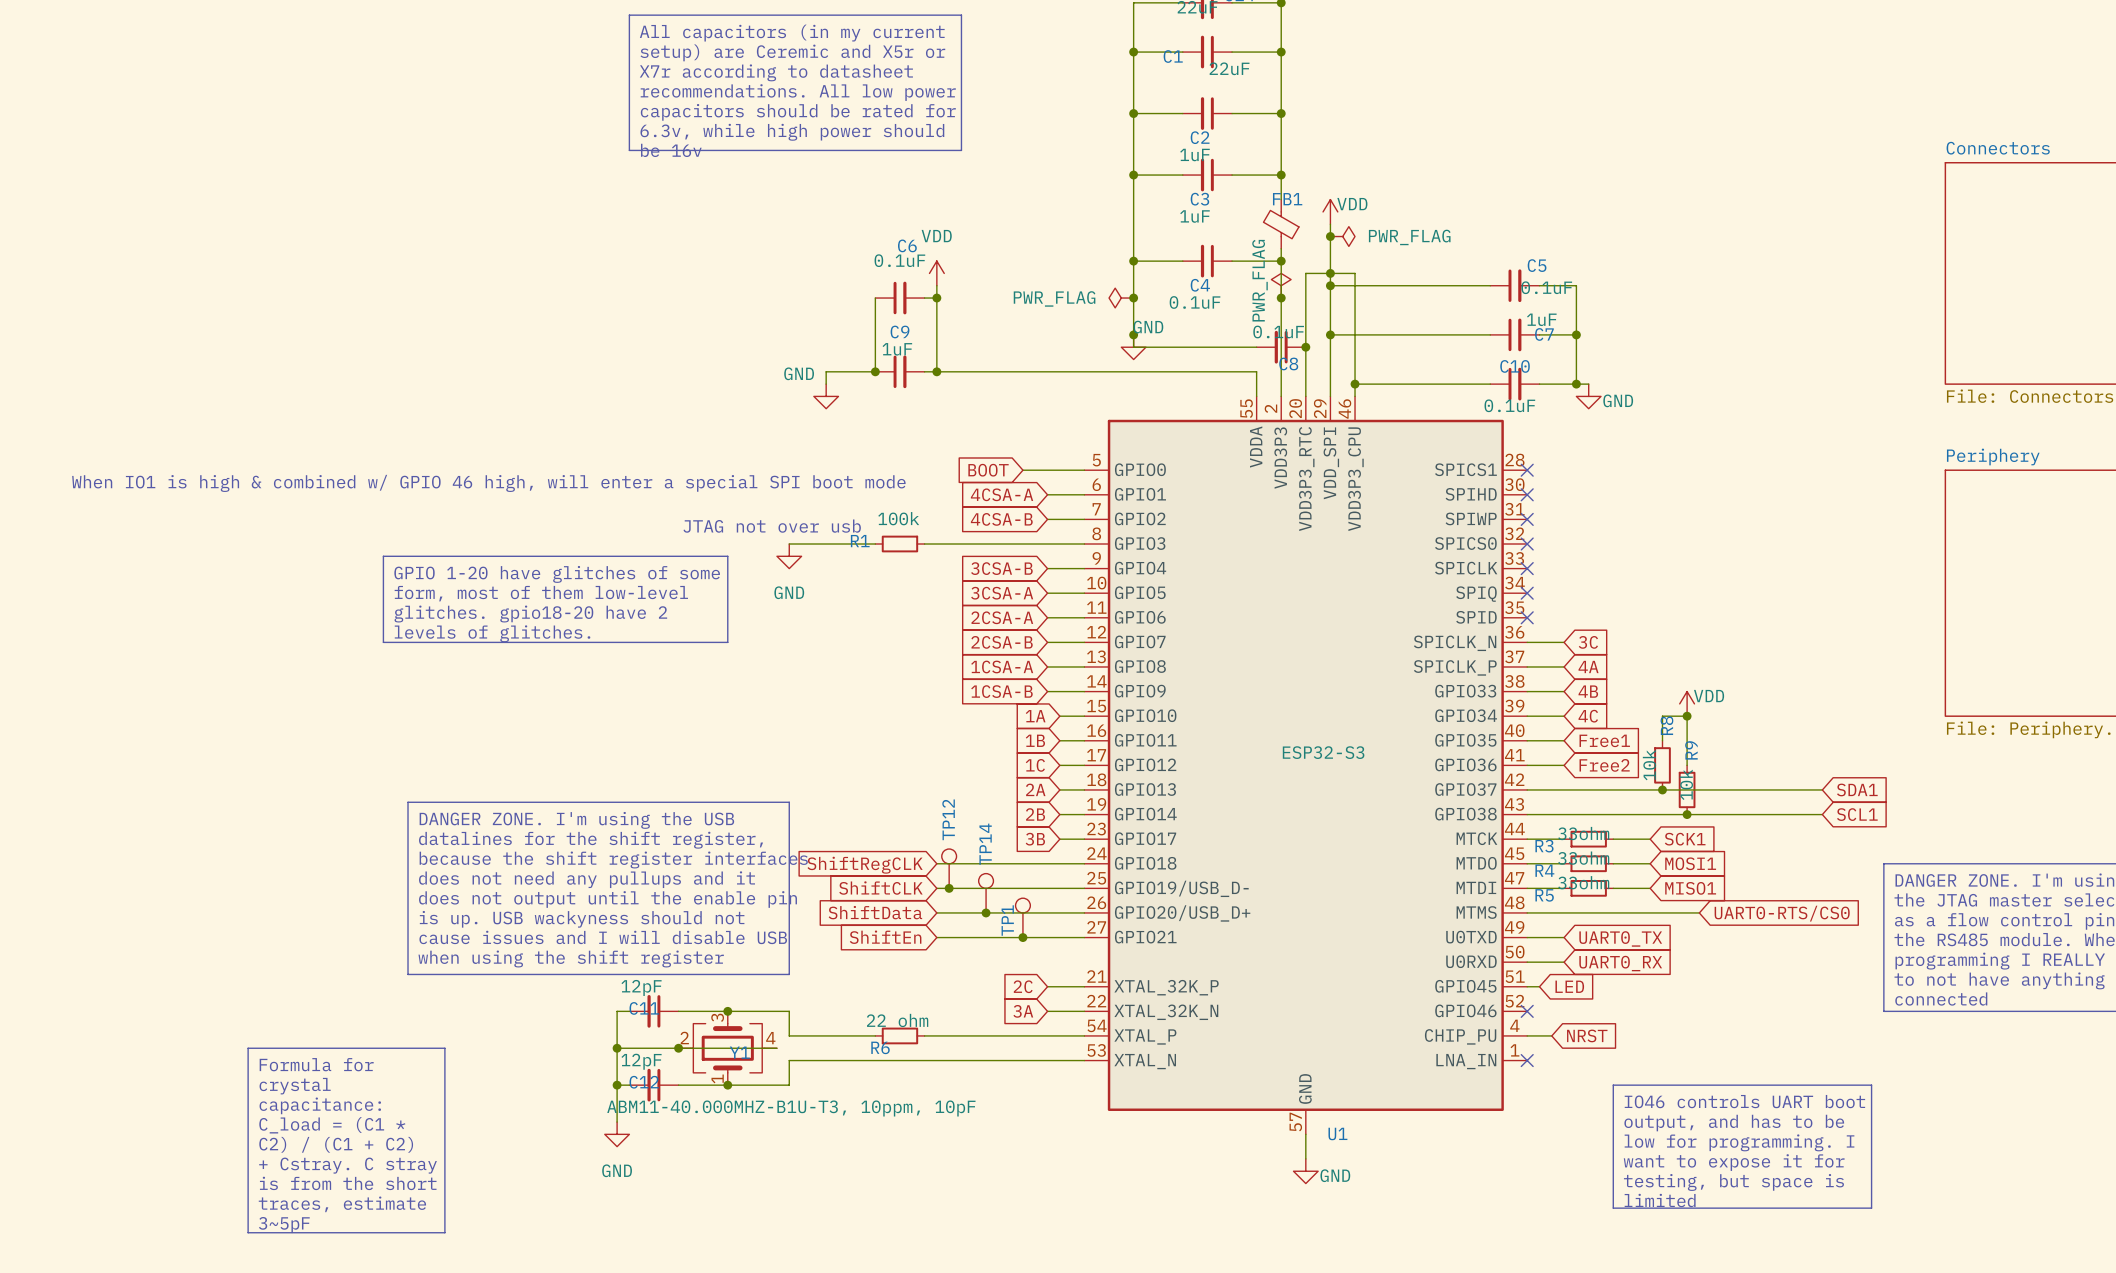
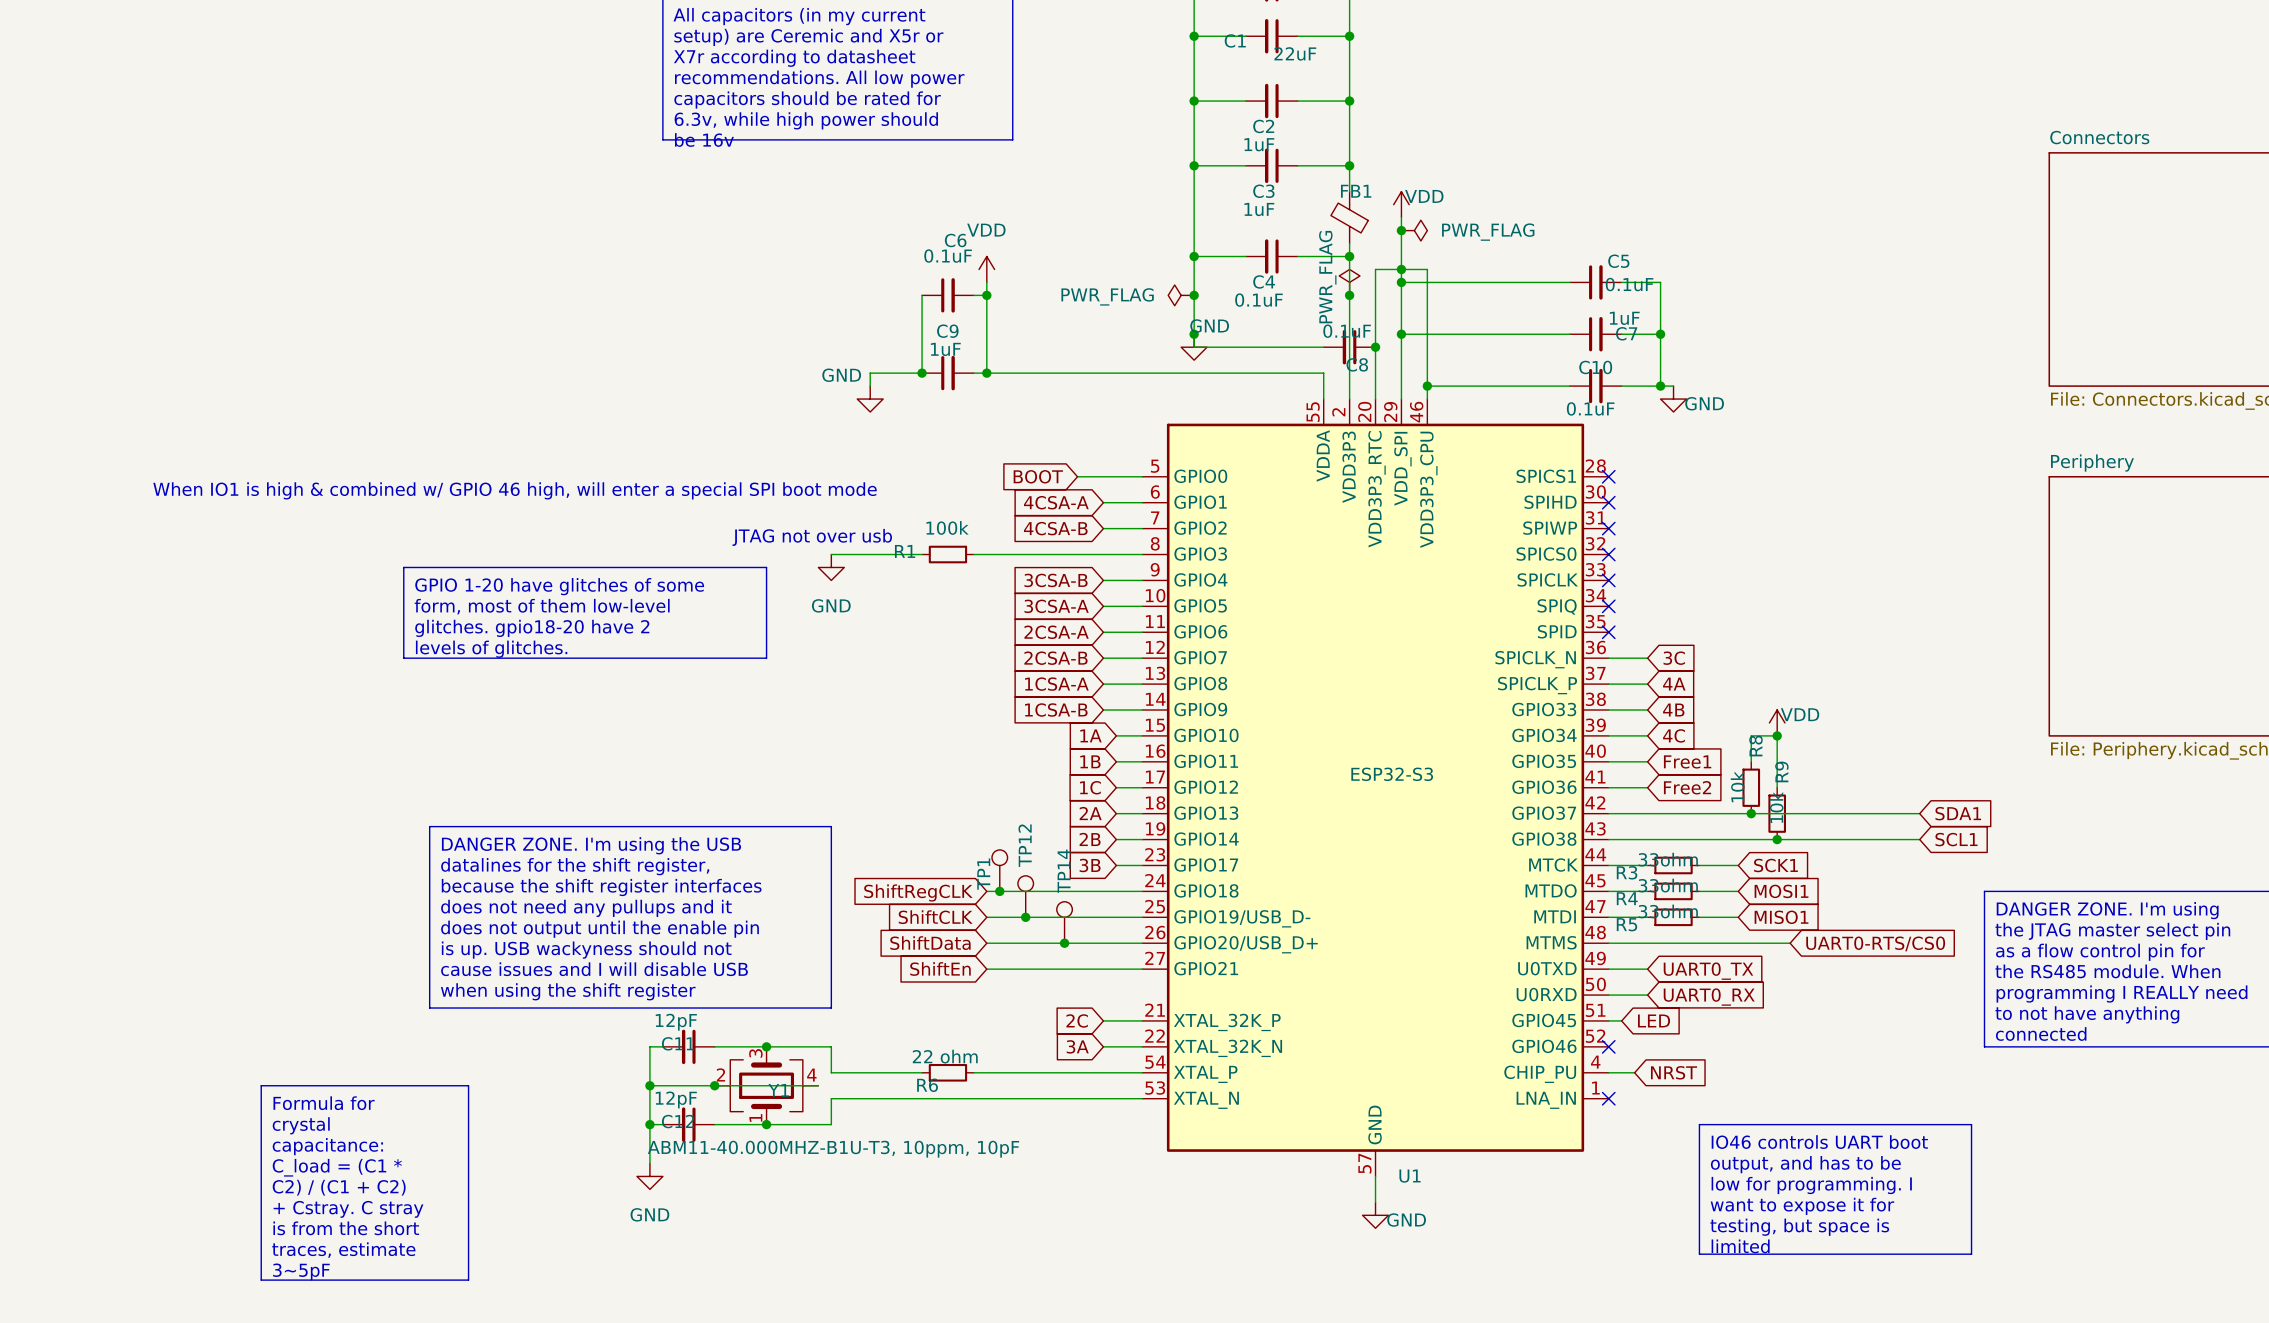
junction: none -> (999, 891)
TP12 position: (949, 868) -> (1025, 896)
junction: (949, 888) -> none
junction: none -> (1025, 917)
TP14 position: (986, 893) -> (1064, 922)
junction: (986, 912) -> none
junction: none -> (1064, 943)
TP1 position: (1022, 917) -> (999, 870)
junction: (1022, 937) -> none

